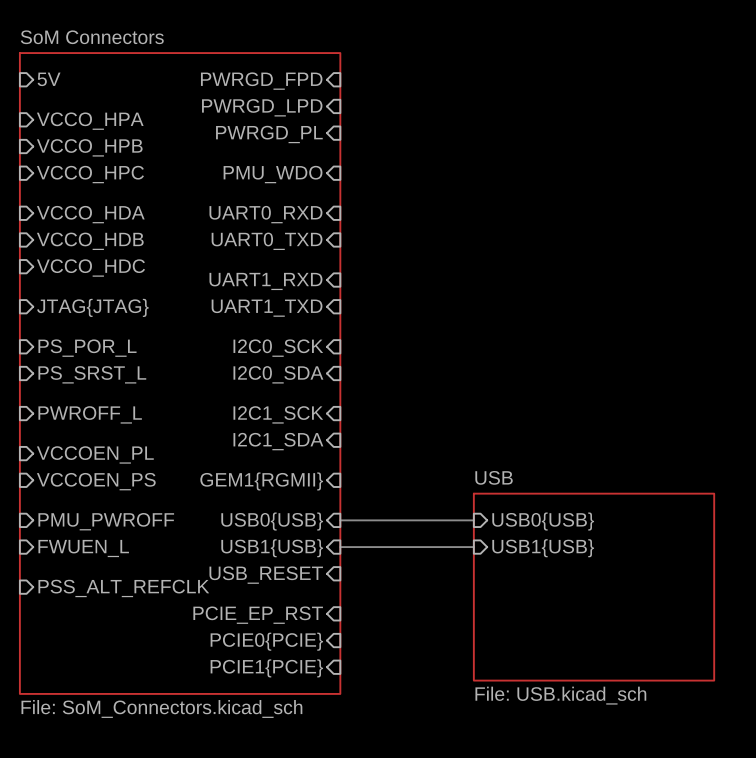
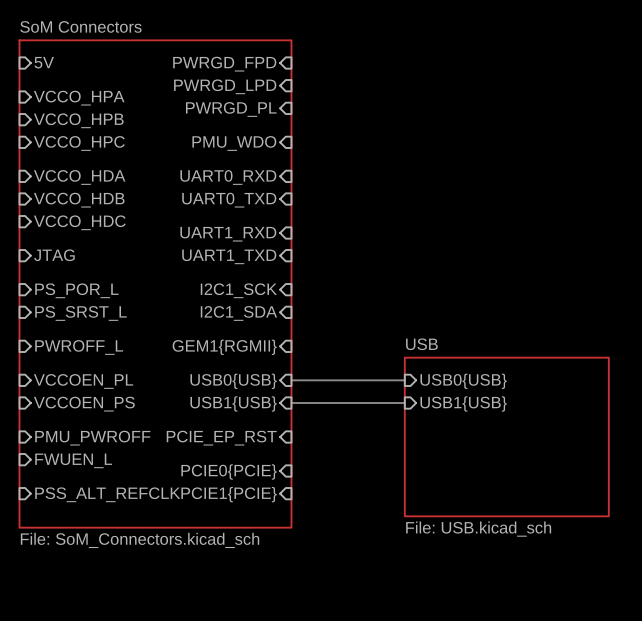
sheet pin: JTAG{JTAG} (92, 307) -> JTAG (54, 255)
sheet SoM Connectors: none -> File: SoM_Connectors.kicad_sch (155, 284)
sheet pin: I2C0_SCK (278, 348) -> I2C1_SCK (238, 290)
sheet SoM Connectors: File: SoM_Connectors.kicad_sch (180, 373) -> none
sheet pin: I2C0_SDA (278, 374) -> I2C1_SDA (238, 313)
sheet pin: I2C1_SCK (278, 414) -> GEM1{RGMII} (224, 347)
sheet pin: I2C1_SDA (278, 441) -> none
sheet pin: none -> USB0{USB} (233, 381)
sheet pin: GEM1{RGMII} (261, 481) -> USB1{USB} (233, 403)
bus: (340, 520) (473, 520) -> (291, 380) (404, 380)
sheet pin: USB0{USB} (272, 521) -> PCIE_EP_RST (221, 438)
sheet pin position: USB0{USB} (543, 521) -> USB0{USB} (463, 381)
bus: (340, 547) (473, 547) -> (291, 403) (404, 403)
sheet pin: USB1{USB} (272, 548) -> none
sheet pin position: USB1{USB} (543, 548) -> USB1{USB} (463, 403)
sheet pin: USB_RESET (266, 575) -> none
sheet USB position: (594, 587) -> (506, 437)
sheet pin: PCIE_EP_RST (258, 615) -> none
sheet pin position: PCIE0{PCIE} (266, 641) -> PCIE0{PCIE} (229, 471)
sheet pin position: PCIE1{PCIE} (266, 668) -> PCIE1{PCIE} (229, 494)

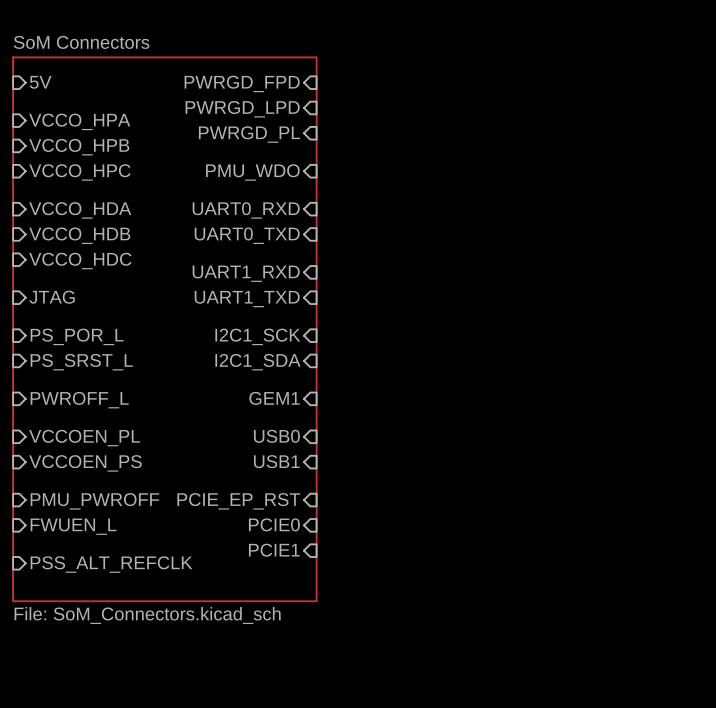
sheet pin: GEM1{RGMII} (224, 347) -> GEM1 (274, 398)
bus: (291, 380) (404, 380) -> none
sheet pin: USB0{USB} (233, 381) -> USB0 (276, 436)
sheet pin: USB0{USB} (463, 381) -> none
sheet pin: USB1{USB} (233, 403) -> USB1 (276, 461)
bus: (291, 403) (404, 403) -> none
sheet pin: USB1{USB} (463, 403) -> none
sheet USB: File: USB.kicad_sch (506, 437) -> none
sheet pin: PCIE0{PCIE} (229, 471) -> PCIE0 (274, 524)
sheet pin: PCIE1{PCIE} (229, 494) -> PCIE1 (274, 550)

